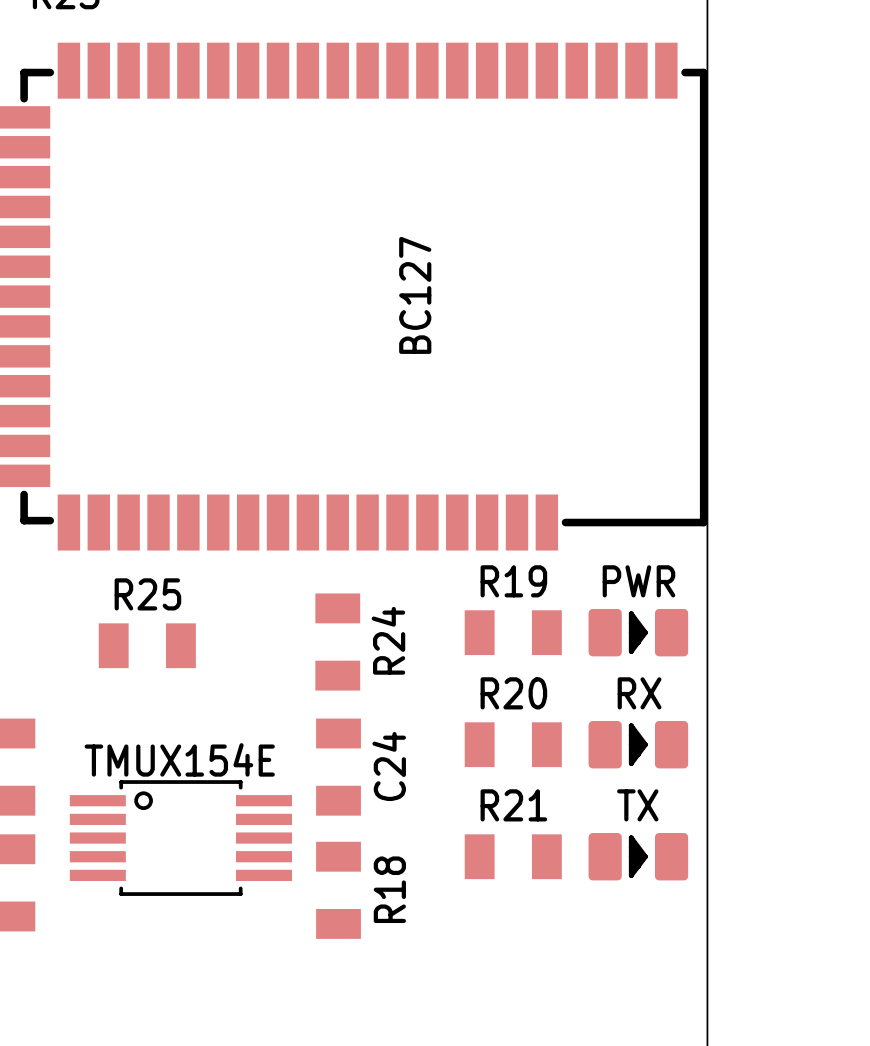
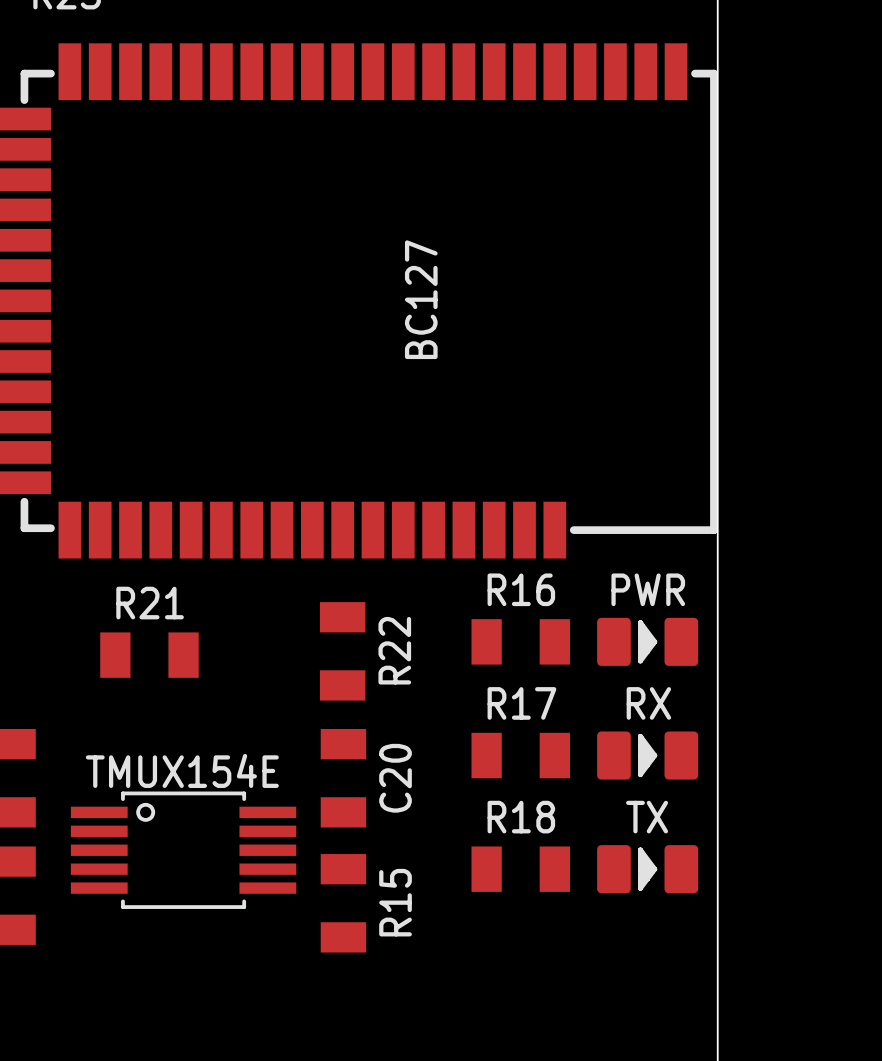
R19 name: R19 (513, 581) -> R16 (521, 589)
R25 name: R25 (147, 594) -> R21 (150, 603)
R24 name: R24 (388, 640) -> R22 (394, 650)
R20 name: R20 (513, 693) -> R17 (521, 703)
C24 name: C24 (389, 766) -> C20 (395, 778)
R21 name: R21 (513, 805) -> R18 (521, 817)
R18 name: R18 (389, 889) -> R15 (395, 902)

